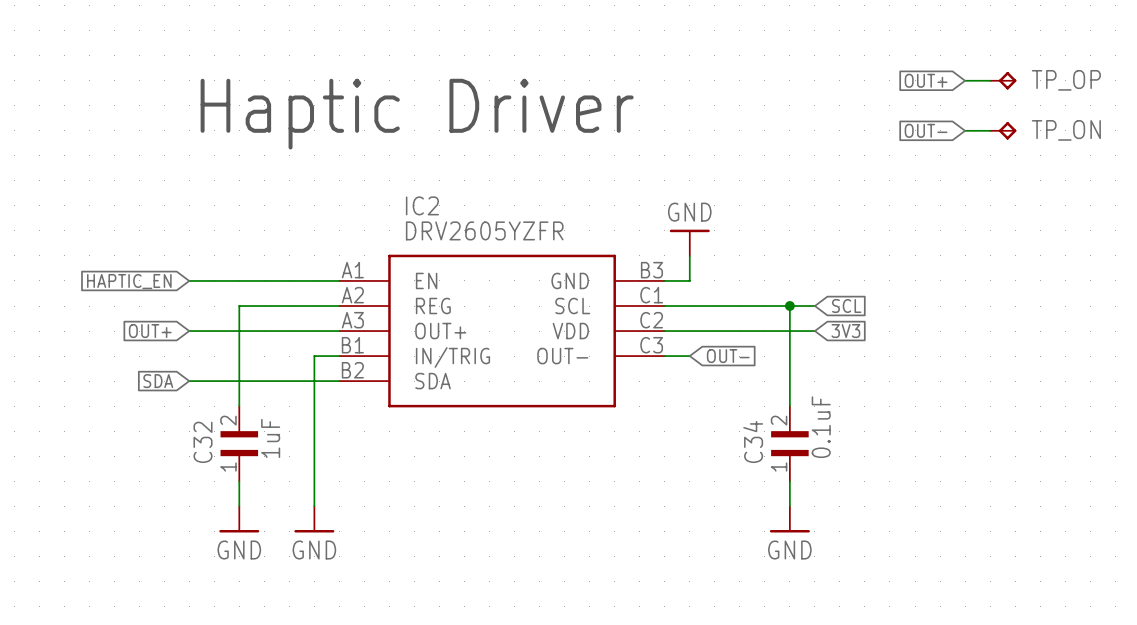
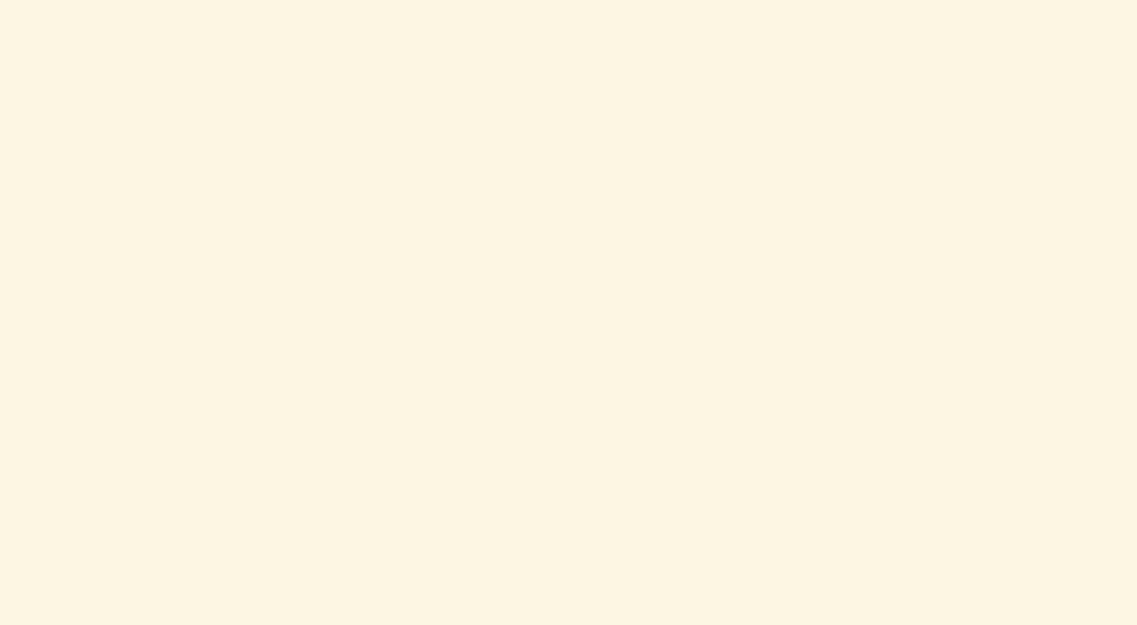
global label: OUT+ (926, 80) -> none
wire: (965, 80) (990, 80) -> none
TP_OP: (1003, 80) -> none
text: Haptic Driver (417, 114) -> none
global label: OUT- (926, 130) -> none
wire: (965, 130) (990, 130) -> none
TP_ON: (1003, 130) -> none
power symbol: GND (689, 242) -> none
wire: (689, 255) (689, 280) (664, 280) -> none
wire: (189, 280) (339, 280) -> none
global label: HAPTIC_EN (129, 281) -> none
wire: (339, 306) (239, 306) (239, 406) -> none
wire: (664, 306) (814, 306) -> none
wire: (789, 306) (789, 406) -> none
junction: (789, 306) -> none
global label: SCL (846, 306) -> none
global label: OUT+ (150, 331) -> none
wire: (189, 331) (339, 331) -> none
IC2: DRV2605YZFR (502, 331) -> none
wire: (664, 331) (814, 331) -> none
global label: 3V3 (845, 331) -> none
wire: (339, 356) (314, 356) (314, 506) -> none
wire: (664, 356) (689, 356) -> none
global label: OUT- (728, 356) -> none
global label: SDA (158, 381) -> none
wire: (189, 381) (339, 381) -> none
C32: 1uF (239, 443) -> none
C34: 0.1uF (789, 443) -> none
wire: (239, 481) (239, 506) -> none
wire: (789, 481) (789, 506) -> none
power symbol: GND (239, 519) -> none
power symbol: GND (314, 519) -> none
power symbol: GND (789, 519) -> none

